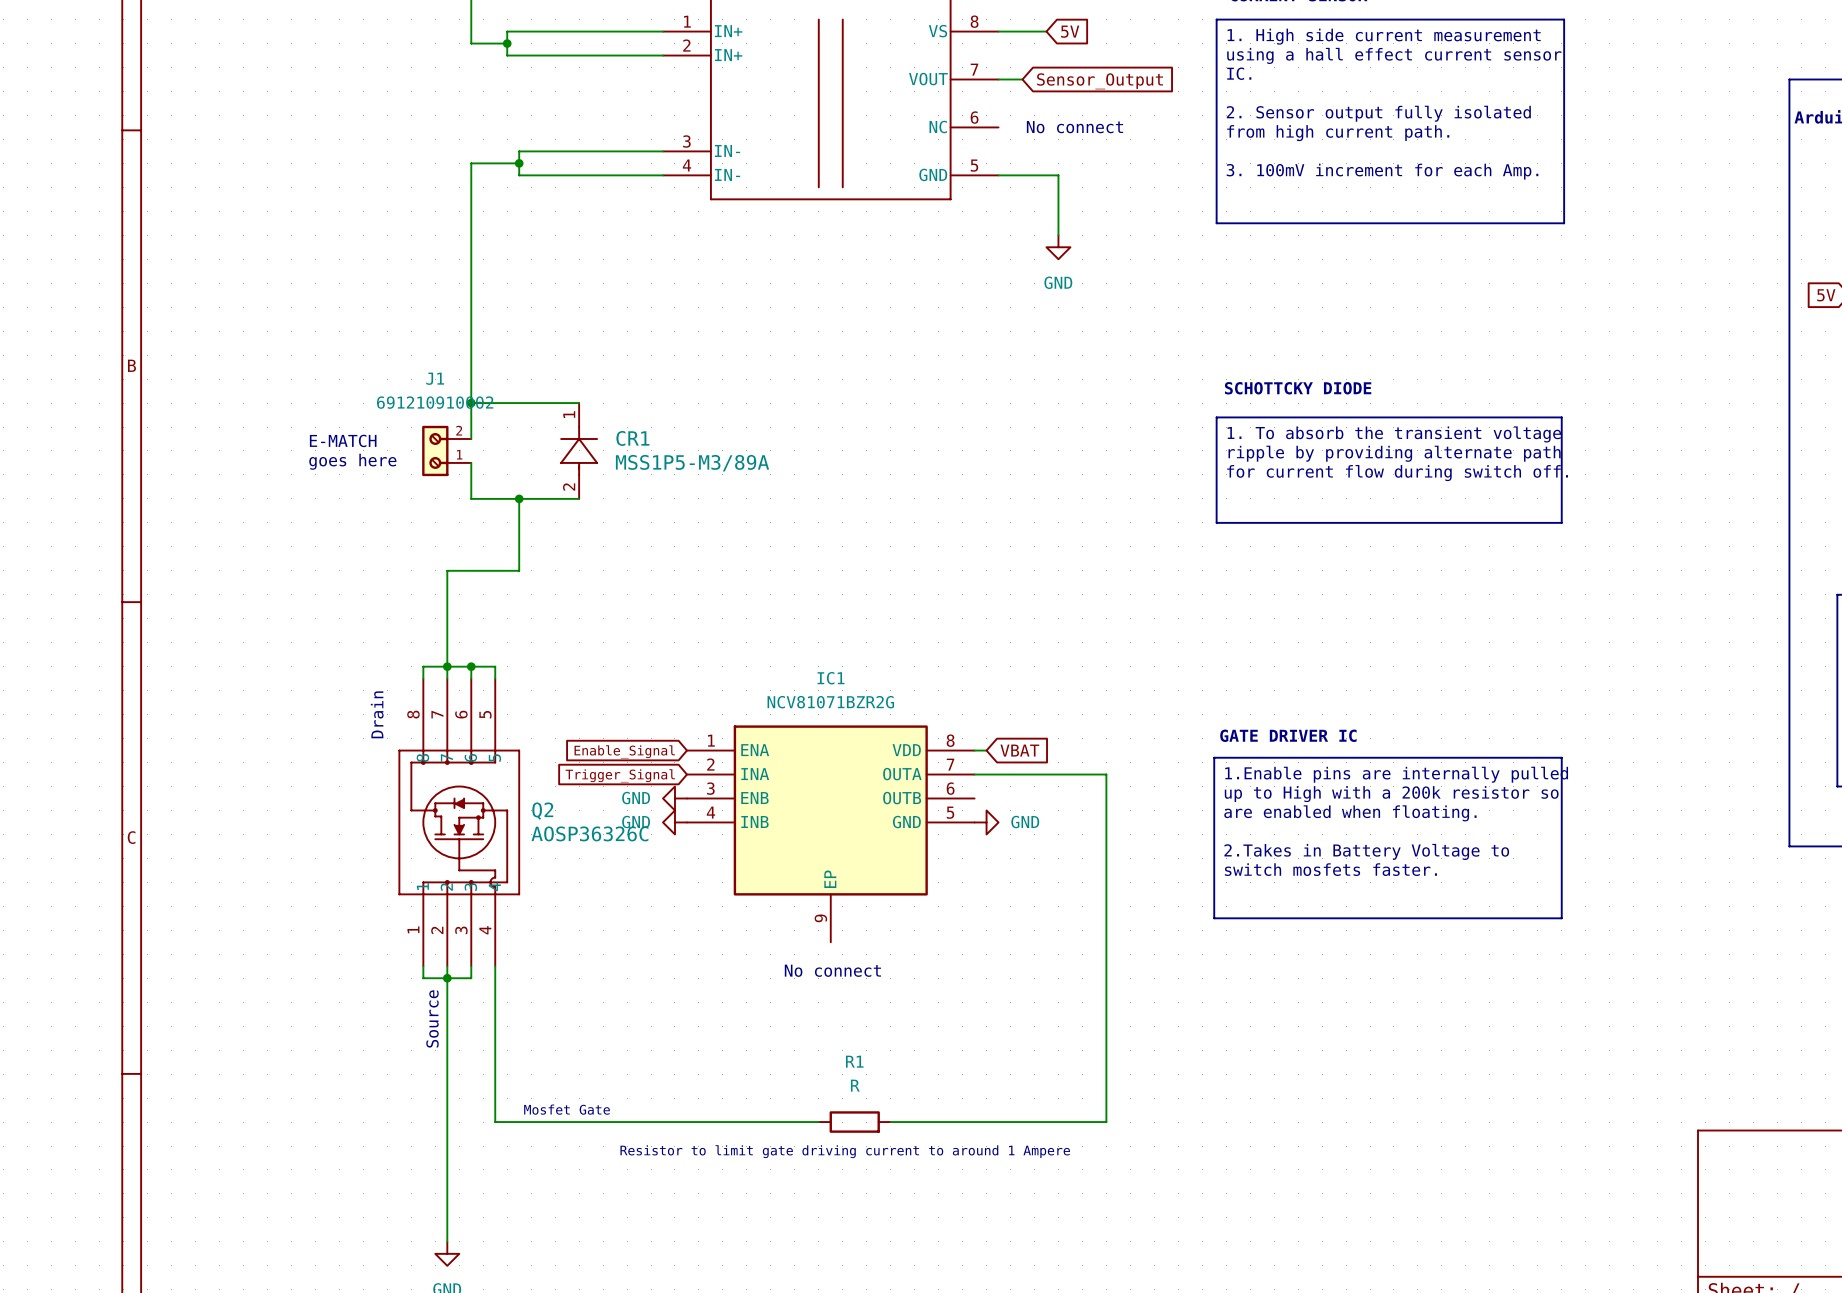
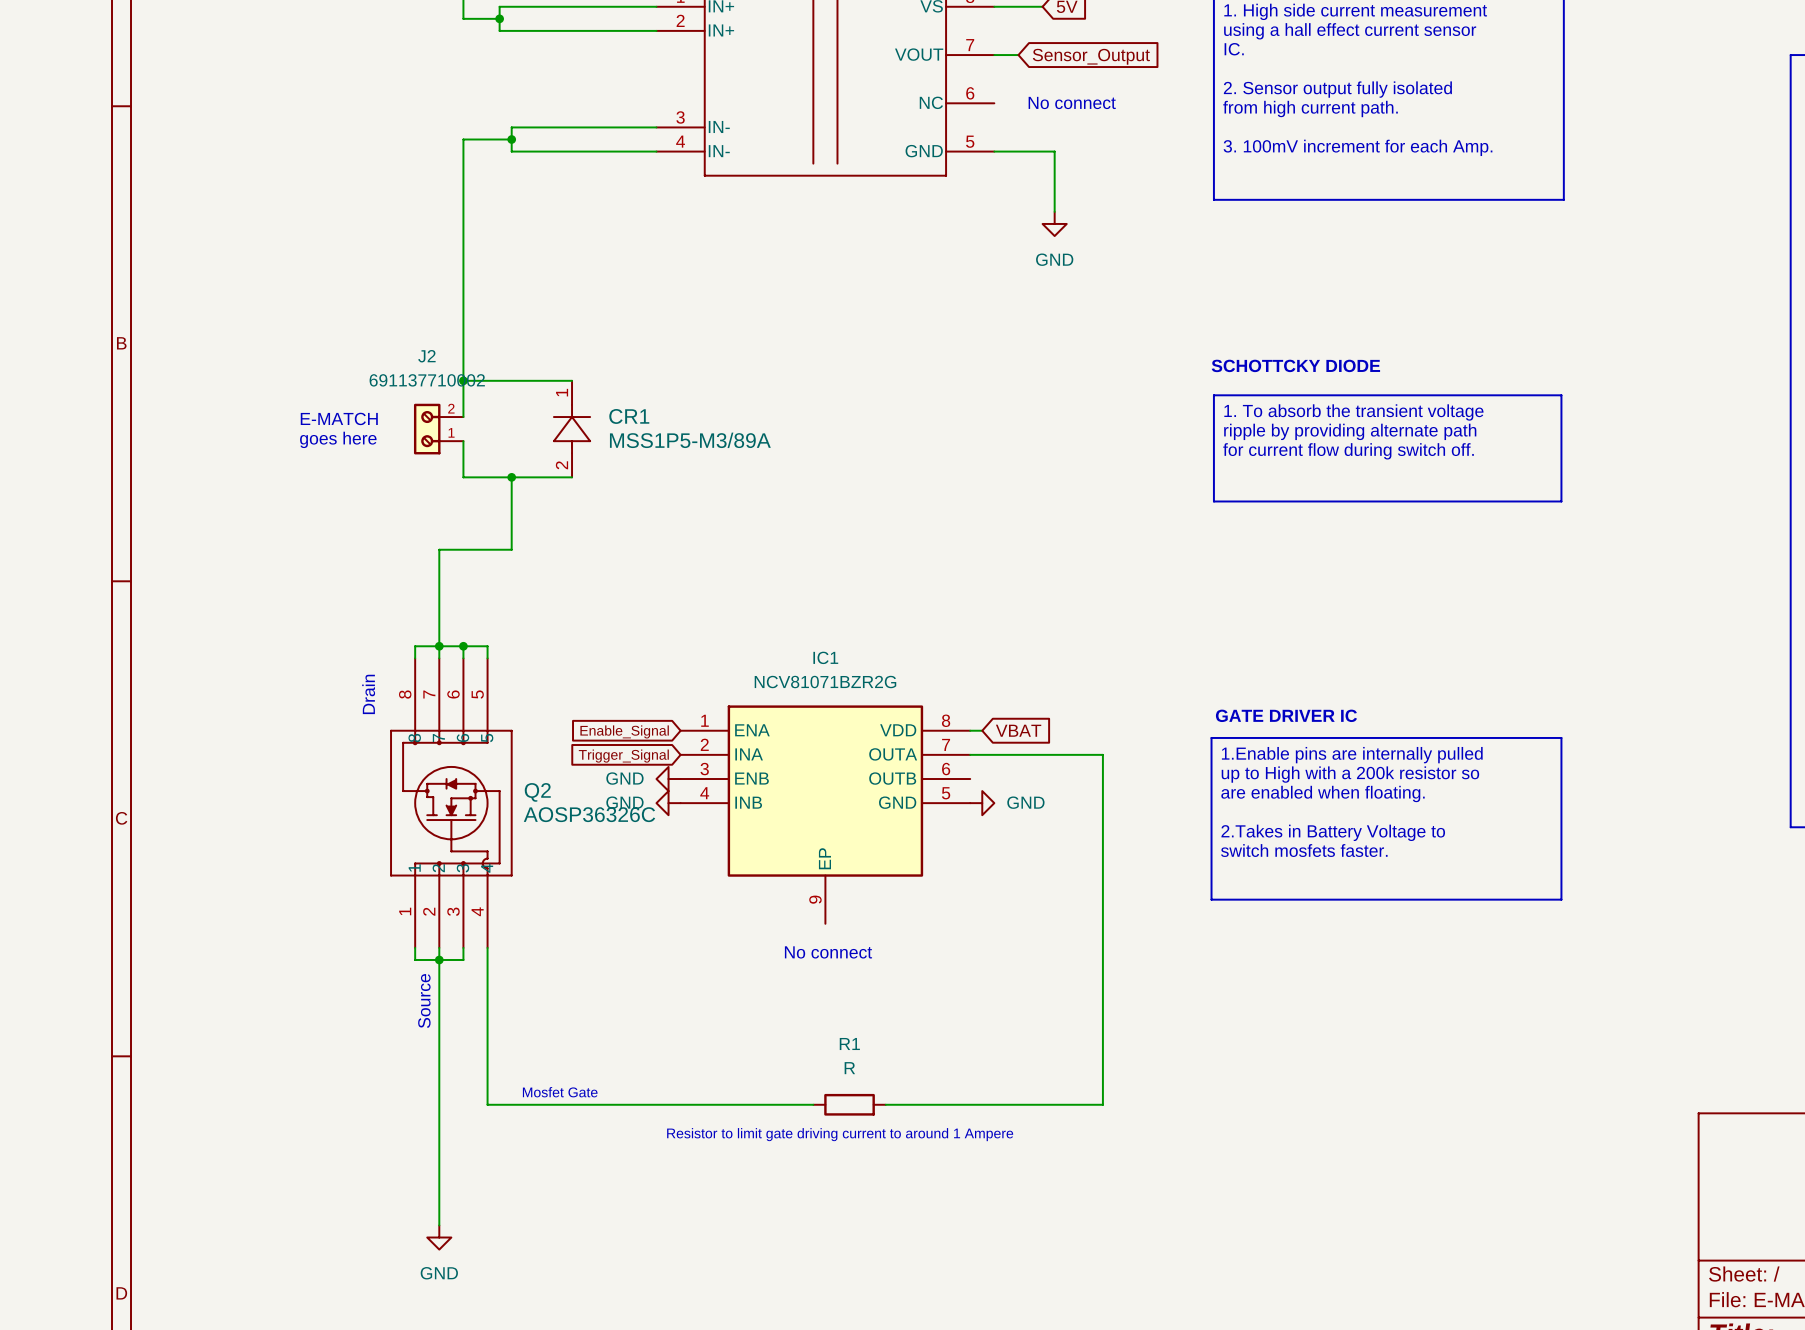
J1 name: J1 (435, 378) -> J2 (426, 356)
J1 value: 691210910002 (435, 402) -> 691137710002 (427, 380)

